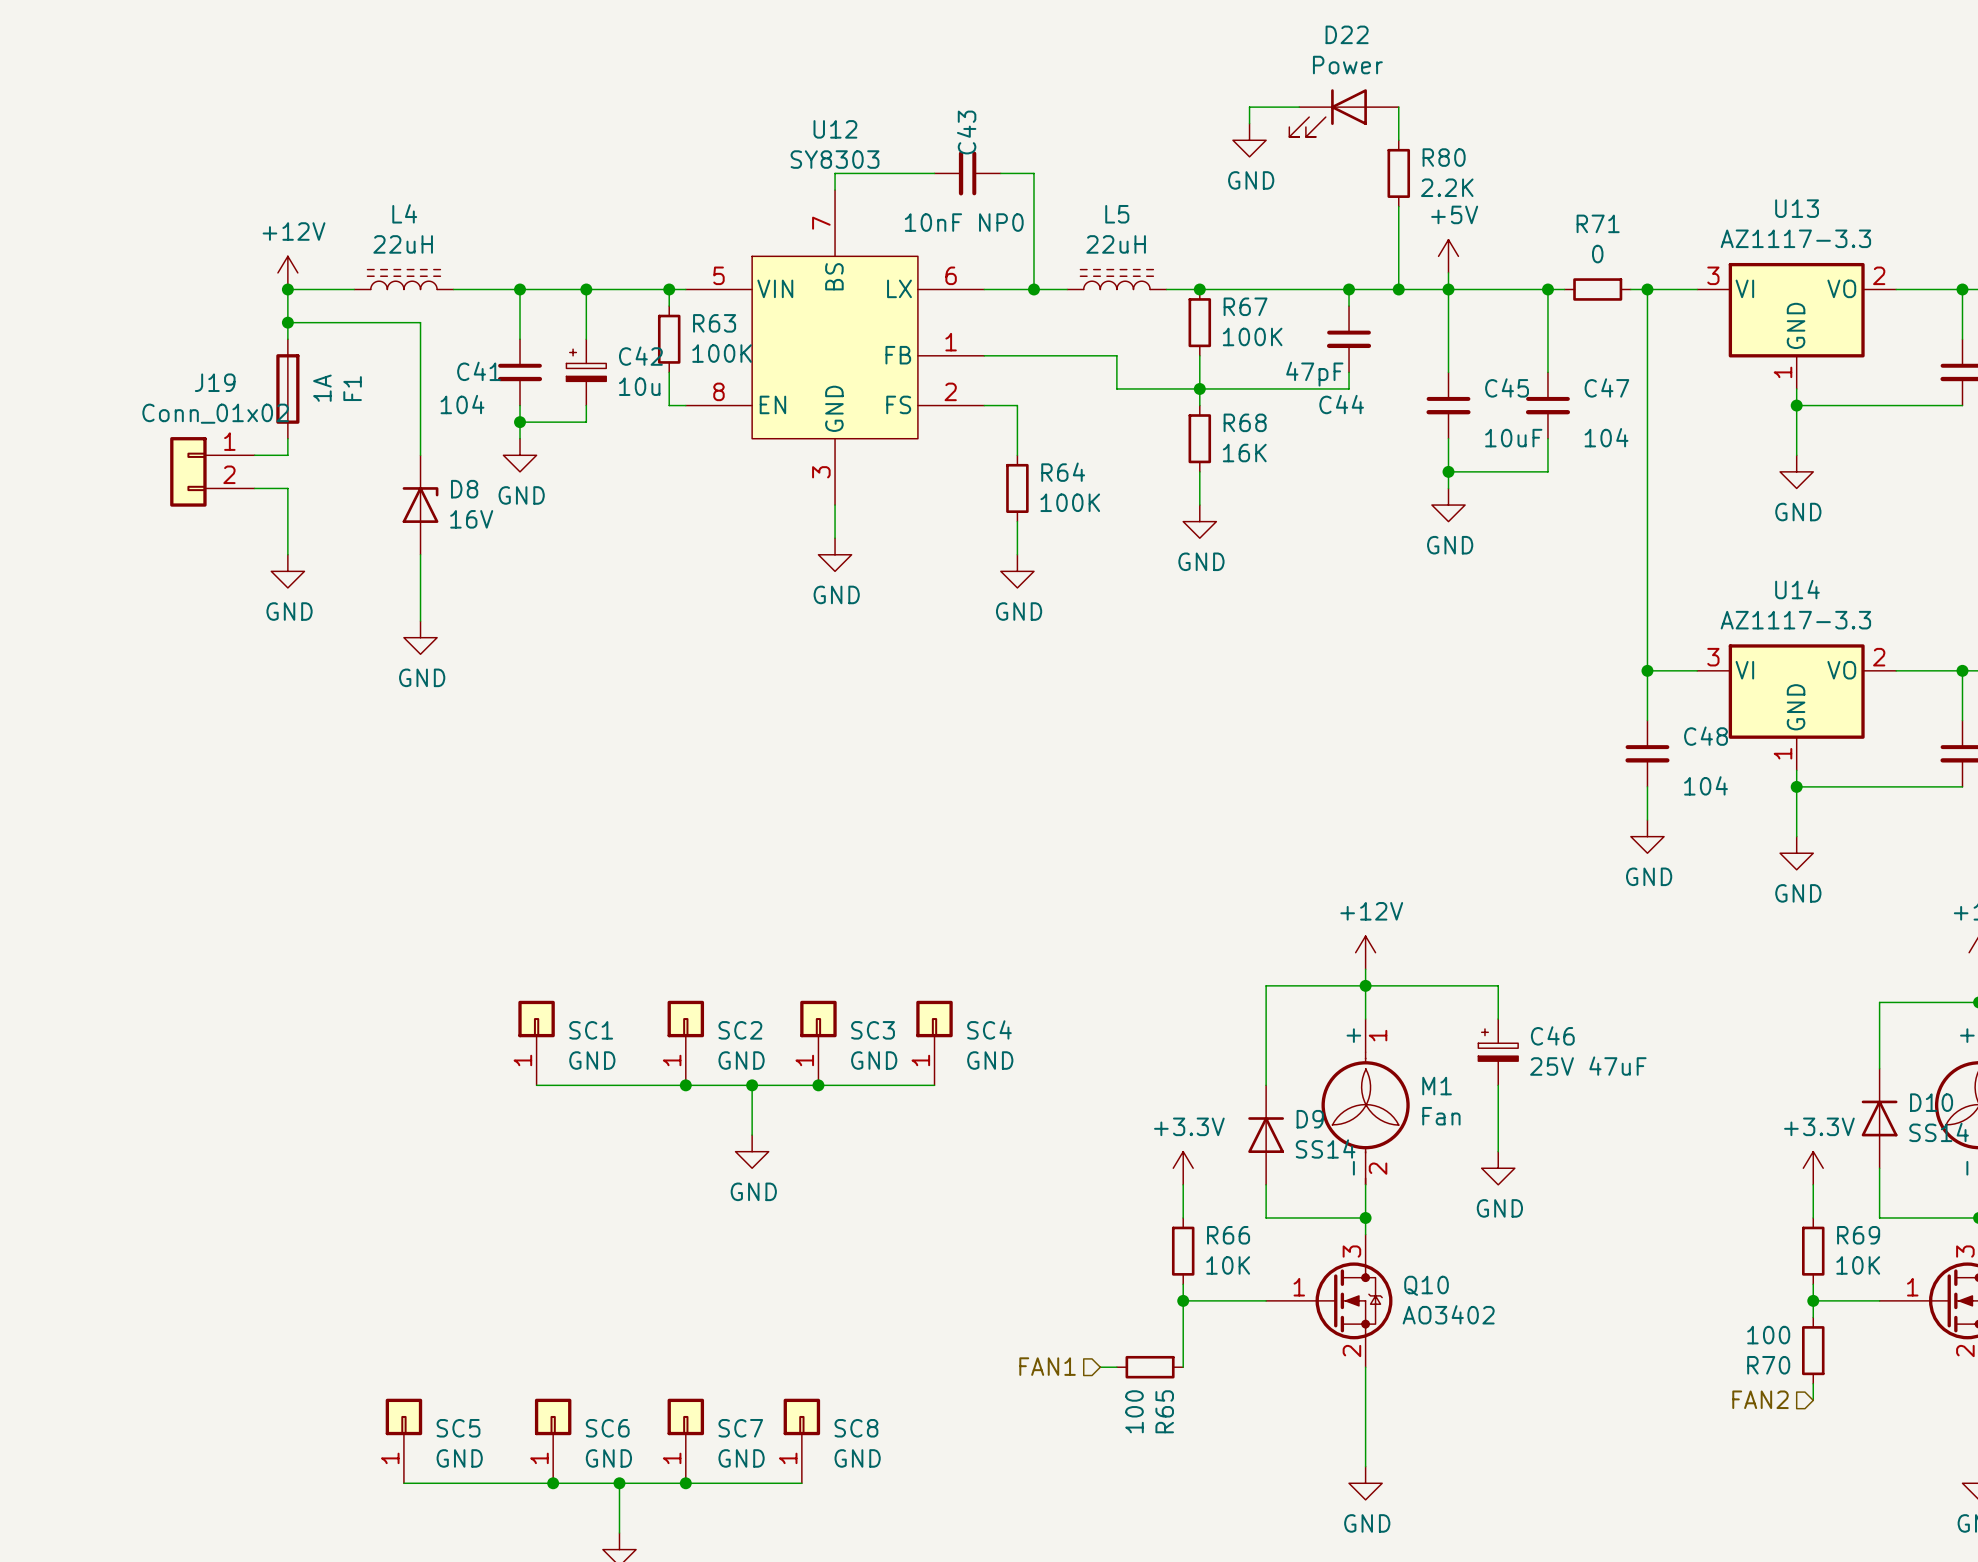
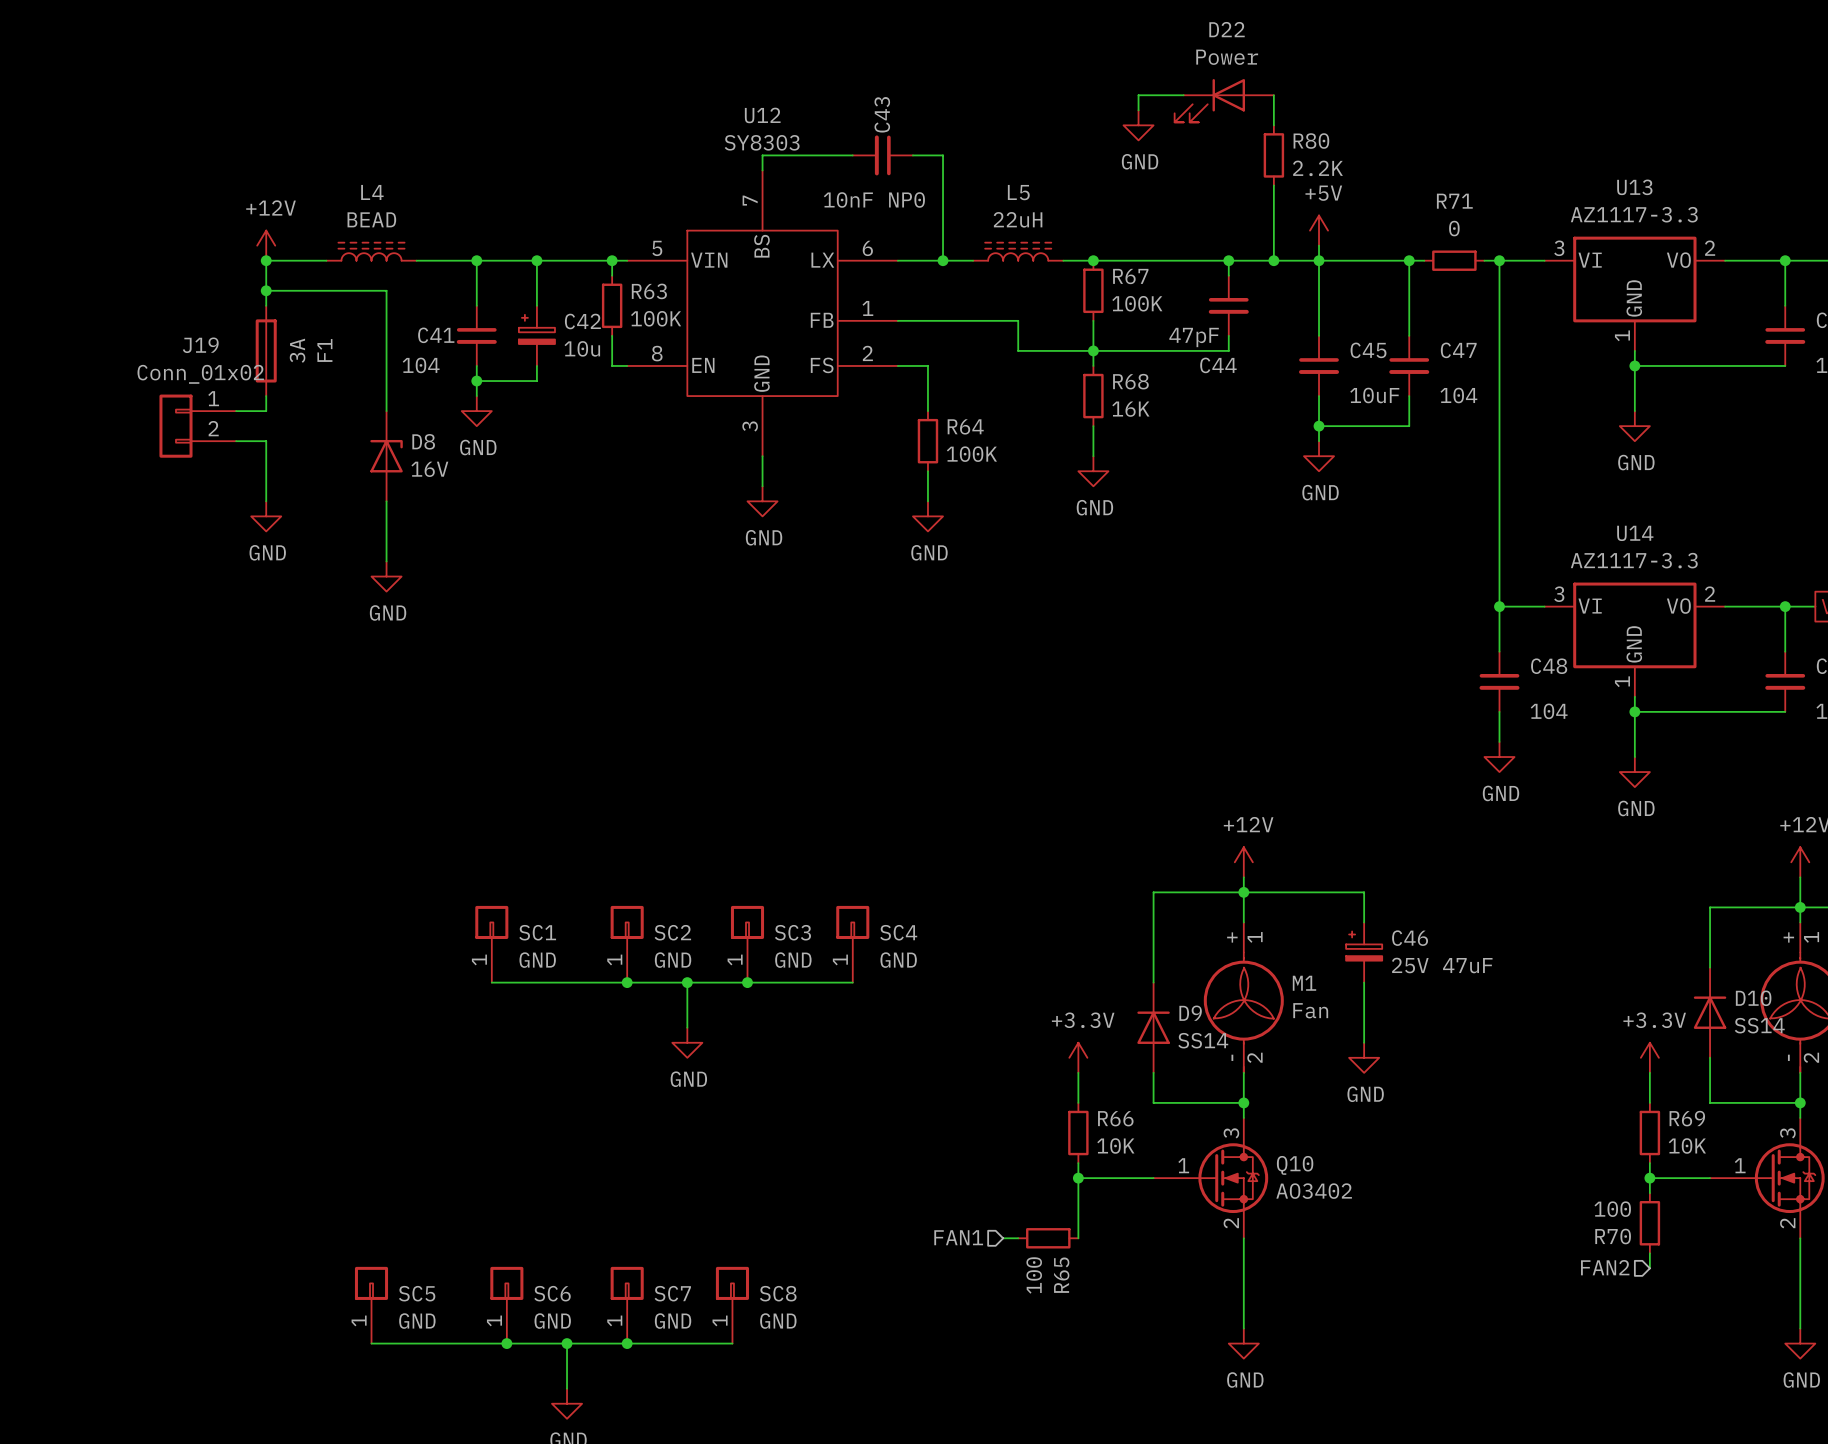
L4 value: 22uH (403, 244) -> BEAD (371, 219)
F1 value: 1A (322, 388) -> 3A (297, 350)

